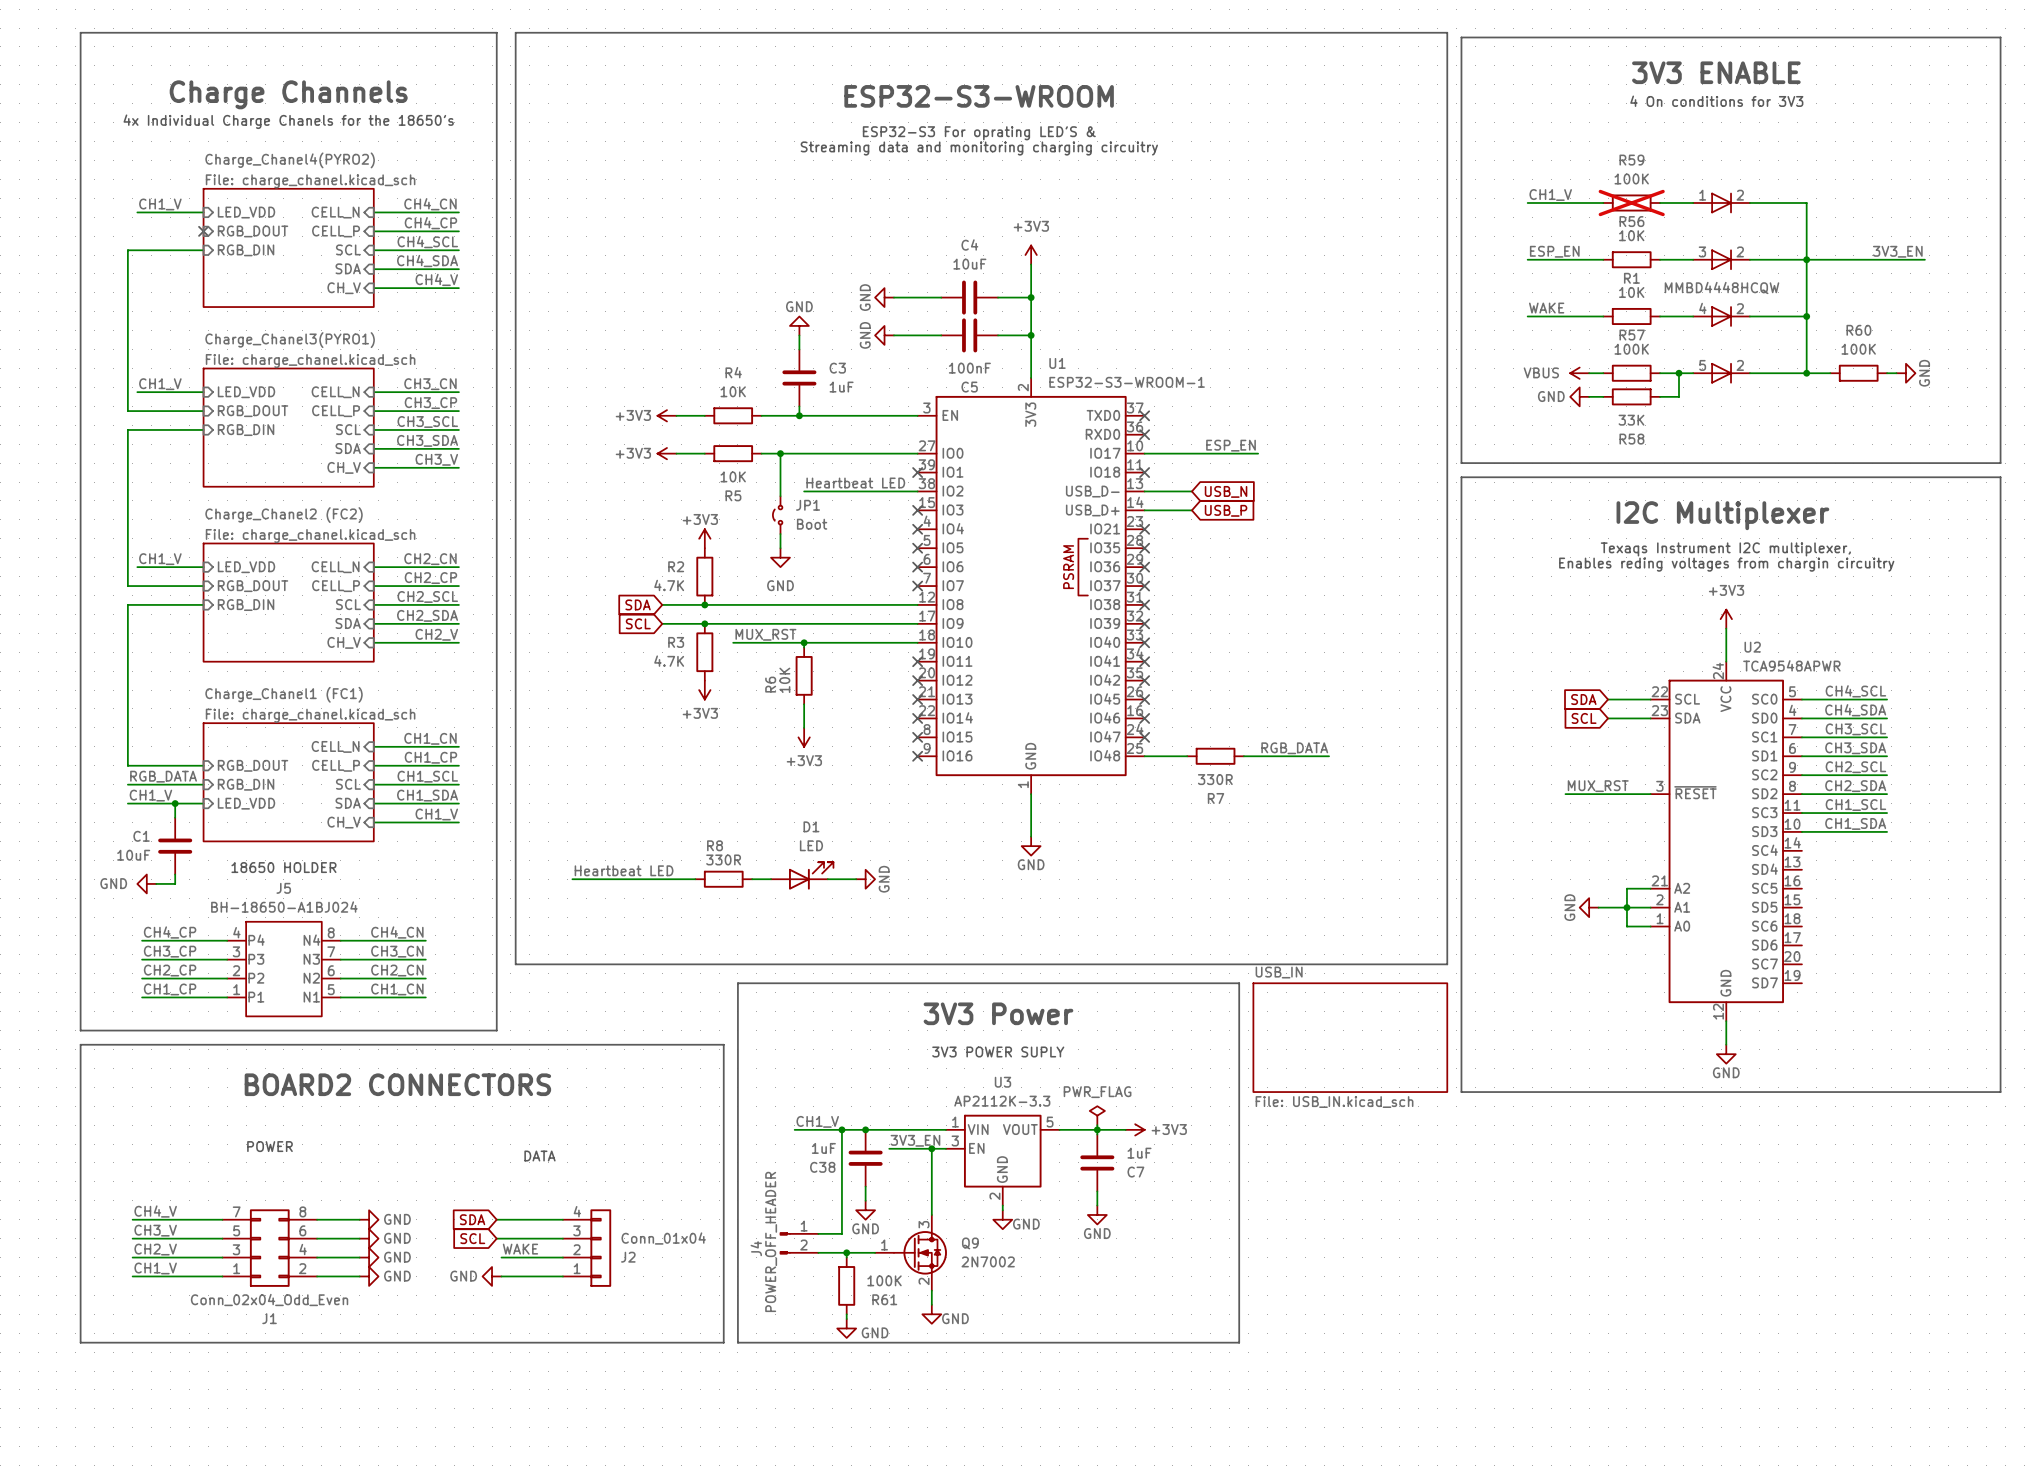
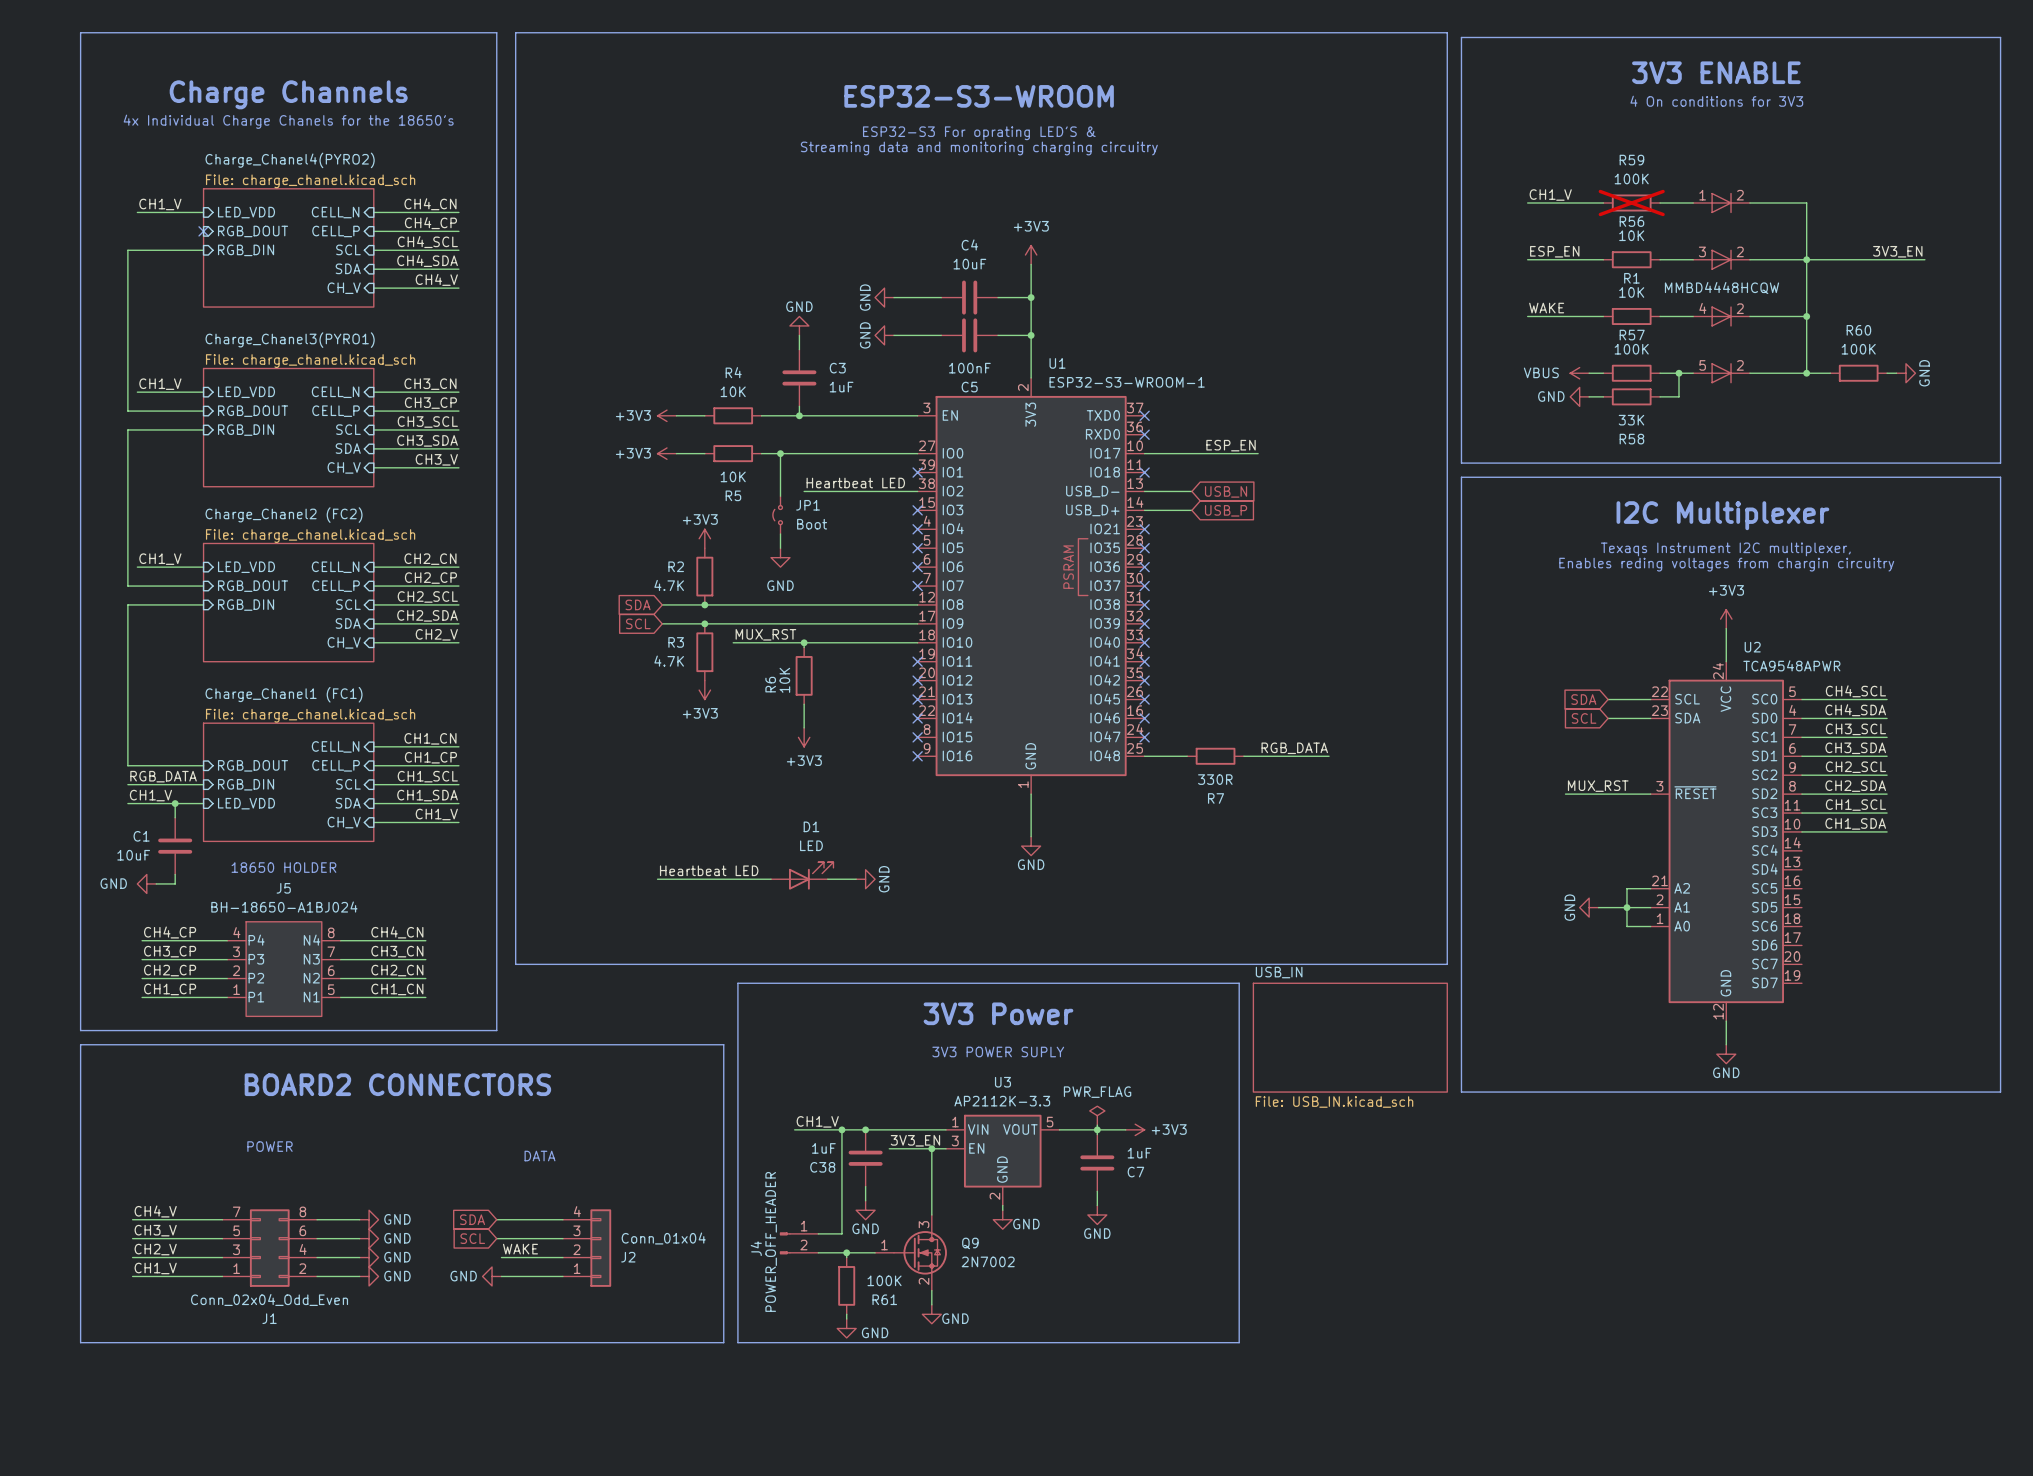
label position: Heartbeat LED (624, 870) -> Heartbeat LED (709, 870)
wire: (572, 879) (657, 879) -> none
wire: none -> (695, 879) (752, 879)
R8: 330R (723, 879) -> none

